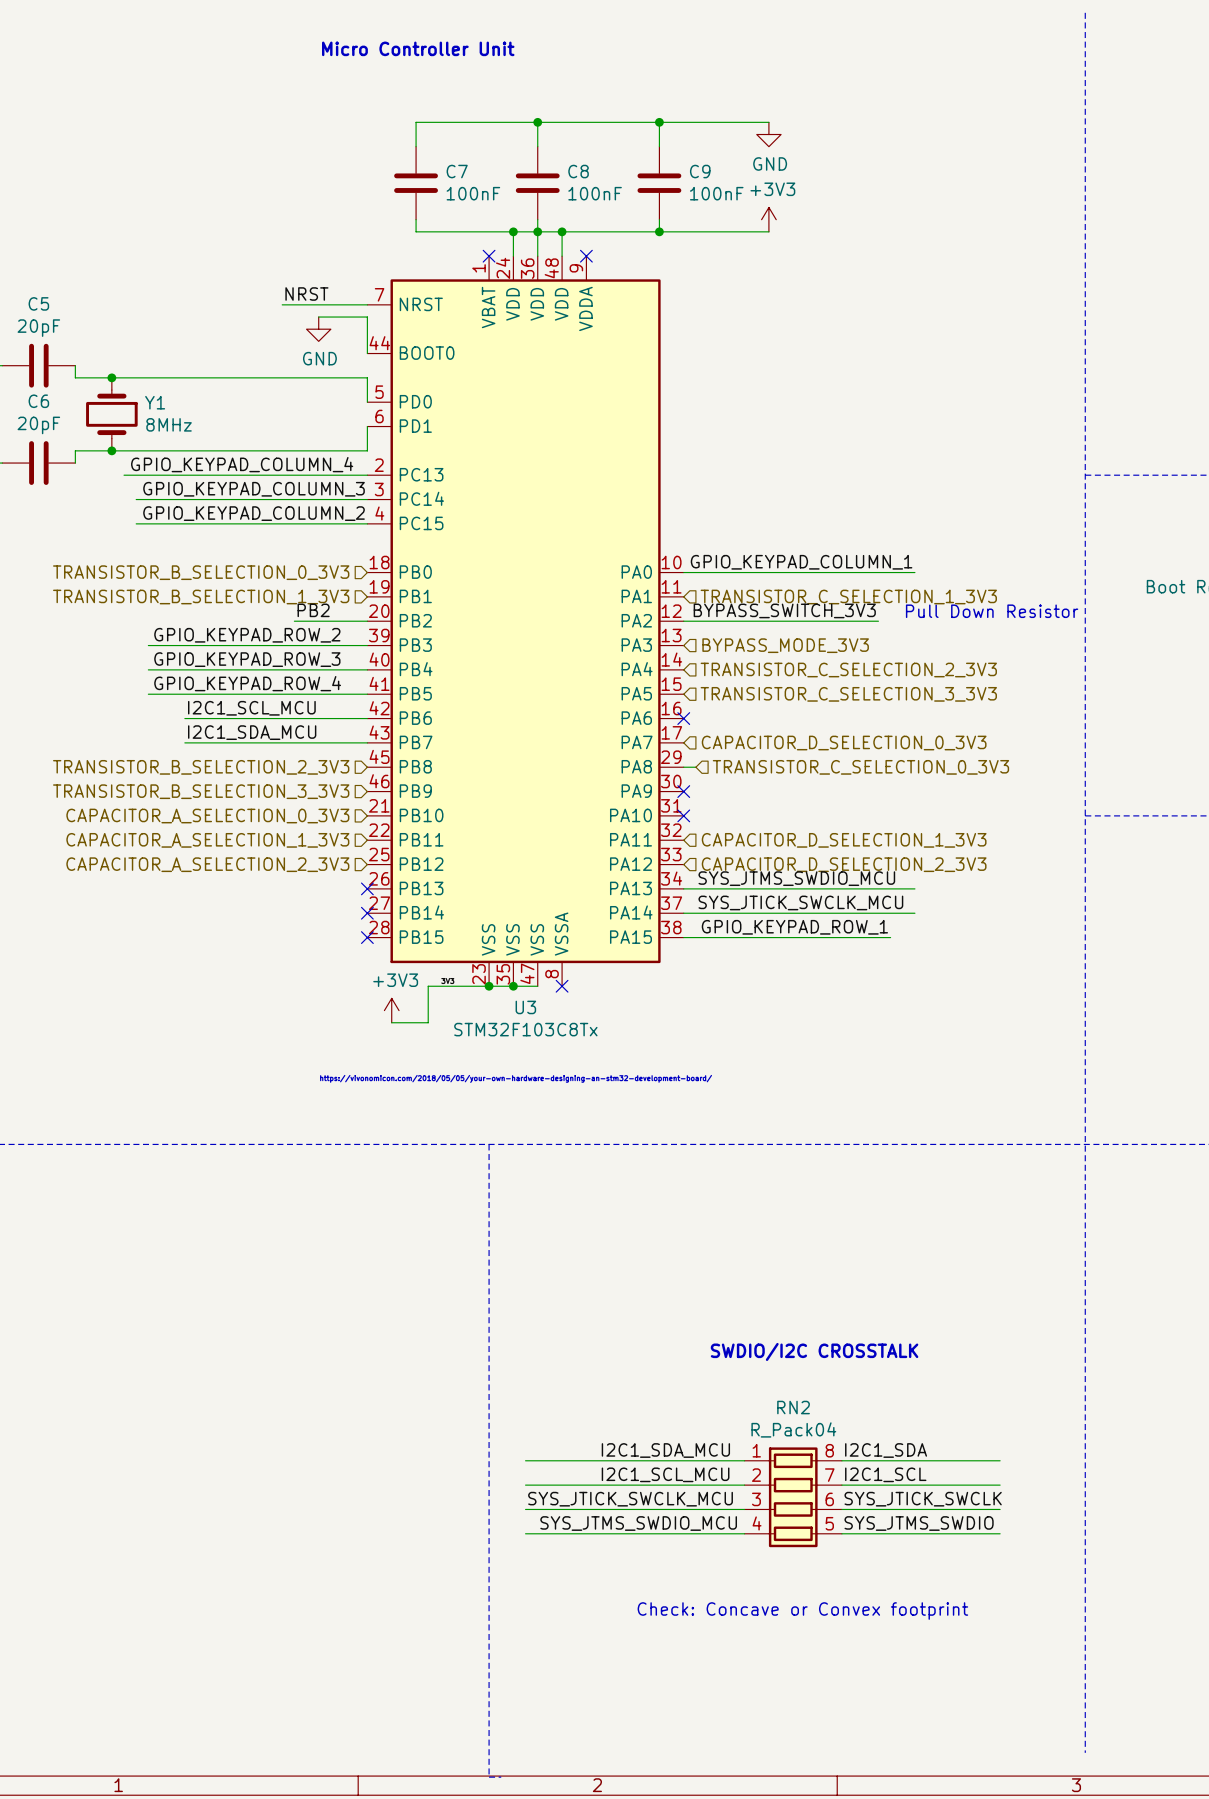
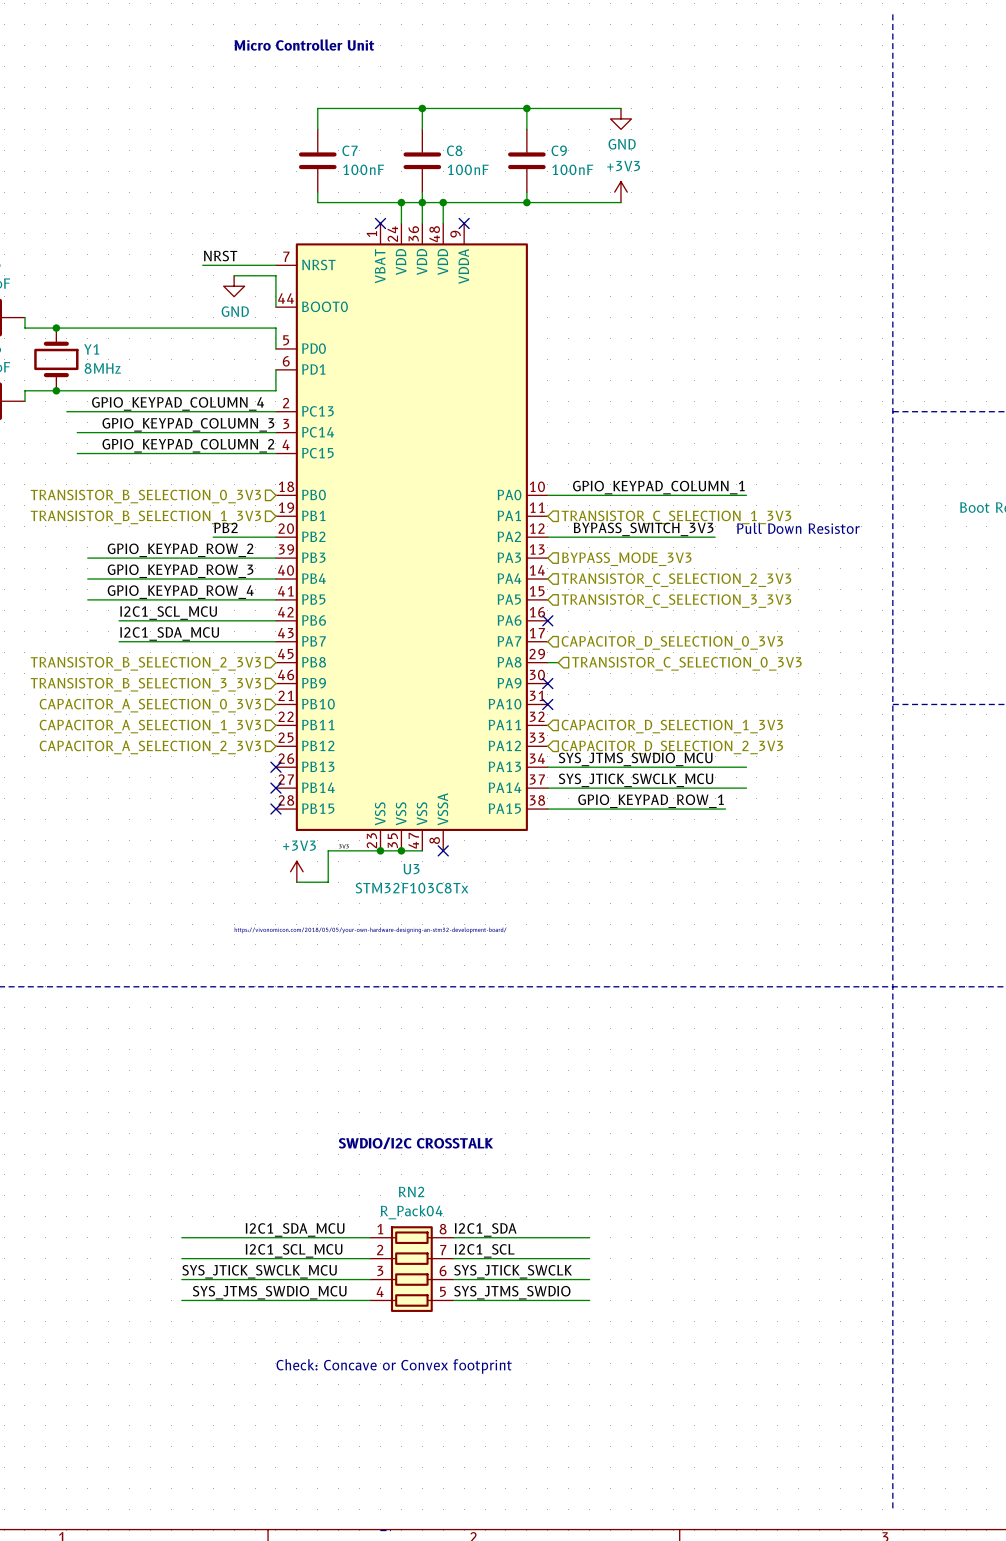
line: (489, 1144) (489, 1777) -> none
text: none -> SWDIO/I2C CROSSTALK (415, 1143)
text: SWDIO/I2C CROSSTALK (814, 1351) -> none
label: none -> I2C1_SDA_MCU (295, 1229)
label: none -> I2C1_SDA (485, 1229)
wire: none -> (181, 1237) (370, 1237)
wire: none -> (453, 1237) (589, 1237)
label: none -> I2C1_SCL_MCU (294, 1250)
label: none -> I2C1_SCL (484, 1250)
label: I2C1_SDA_MCU (665, 1450) -> none
label: I2C1_SDA (886, 1450) -> none
wire: none -> (181, 1258) (370, 1258)
wire: (732, 1460) (744, 1460) -> none
wire: (841, 1460) (1000, 1460) -> none
label: none -> SYS_JTICK_SWCLK_MCU (259, 1271)
label: I2C1_SCL_MCU (665, 1474) -> none
label: I2C1_SCL (885, 1474) -> none
wire: none -> (181, 1279) (370, 1279)
wire: (732, 1485) (744, 1485) -> none
wire: (841, 1485) (1000, 1485) -> none
RN2 position: (793, 1497) -> (411, 1269)
label: none -> SYS_JTMS_SWDIO_MCU (269, 1292)
label: SYS_JTICK_SWCLK_MCU (630, 1499) -> SYS_JTICK_SWCLK (513, 1271)
label: SYS_JTICK_SWCLK (923, 1499) -> none
wire: none -> (181, 1300) (370, 1300)
wire: (732, 1509) (744, 1509) -> none
wire: (841, 1509) (1000, 1509) -> none
label: SYS_JTMS_SWDIO_MCU (638, 1523) -> SYS_JTMS_SWDIO (512, 1292)
label: SYS_JTMS_SWDIO (919, 1523) -> none
wire: (525, 1533) (744, 1533) -> none
wire: (841, 1533) (1000, 1533) -> none
text: none -> Check: Concave or Convex footprint (394, 1366)
text: Check: Concave or Convex footprint (802, 1611) -> none

